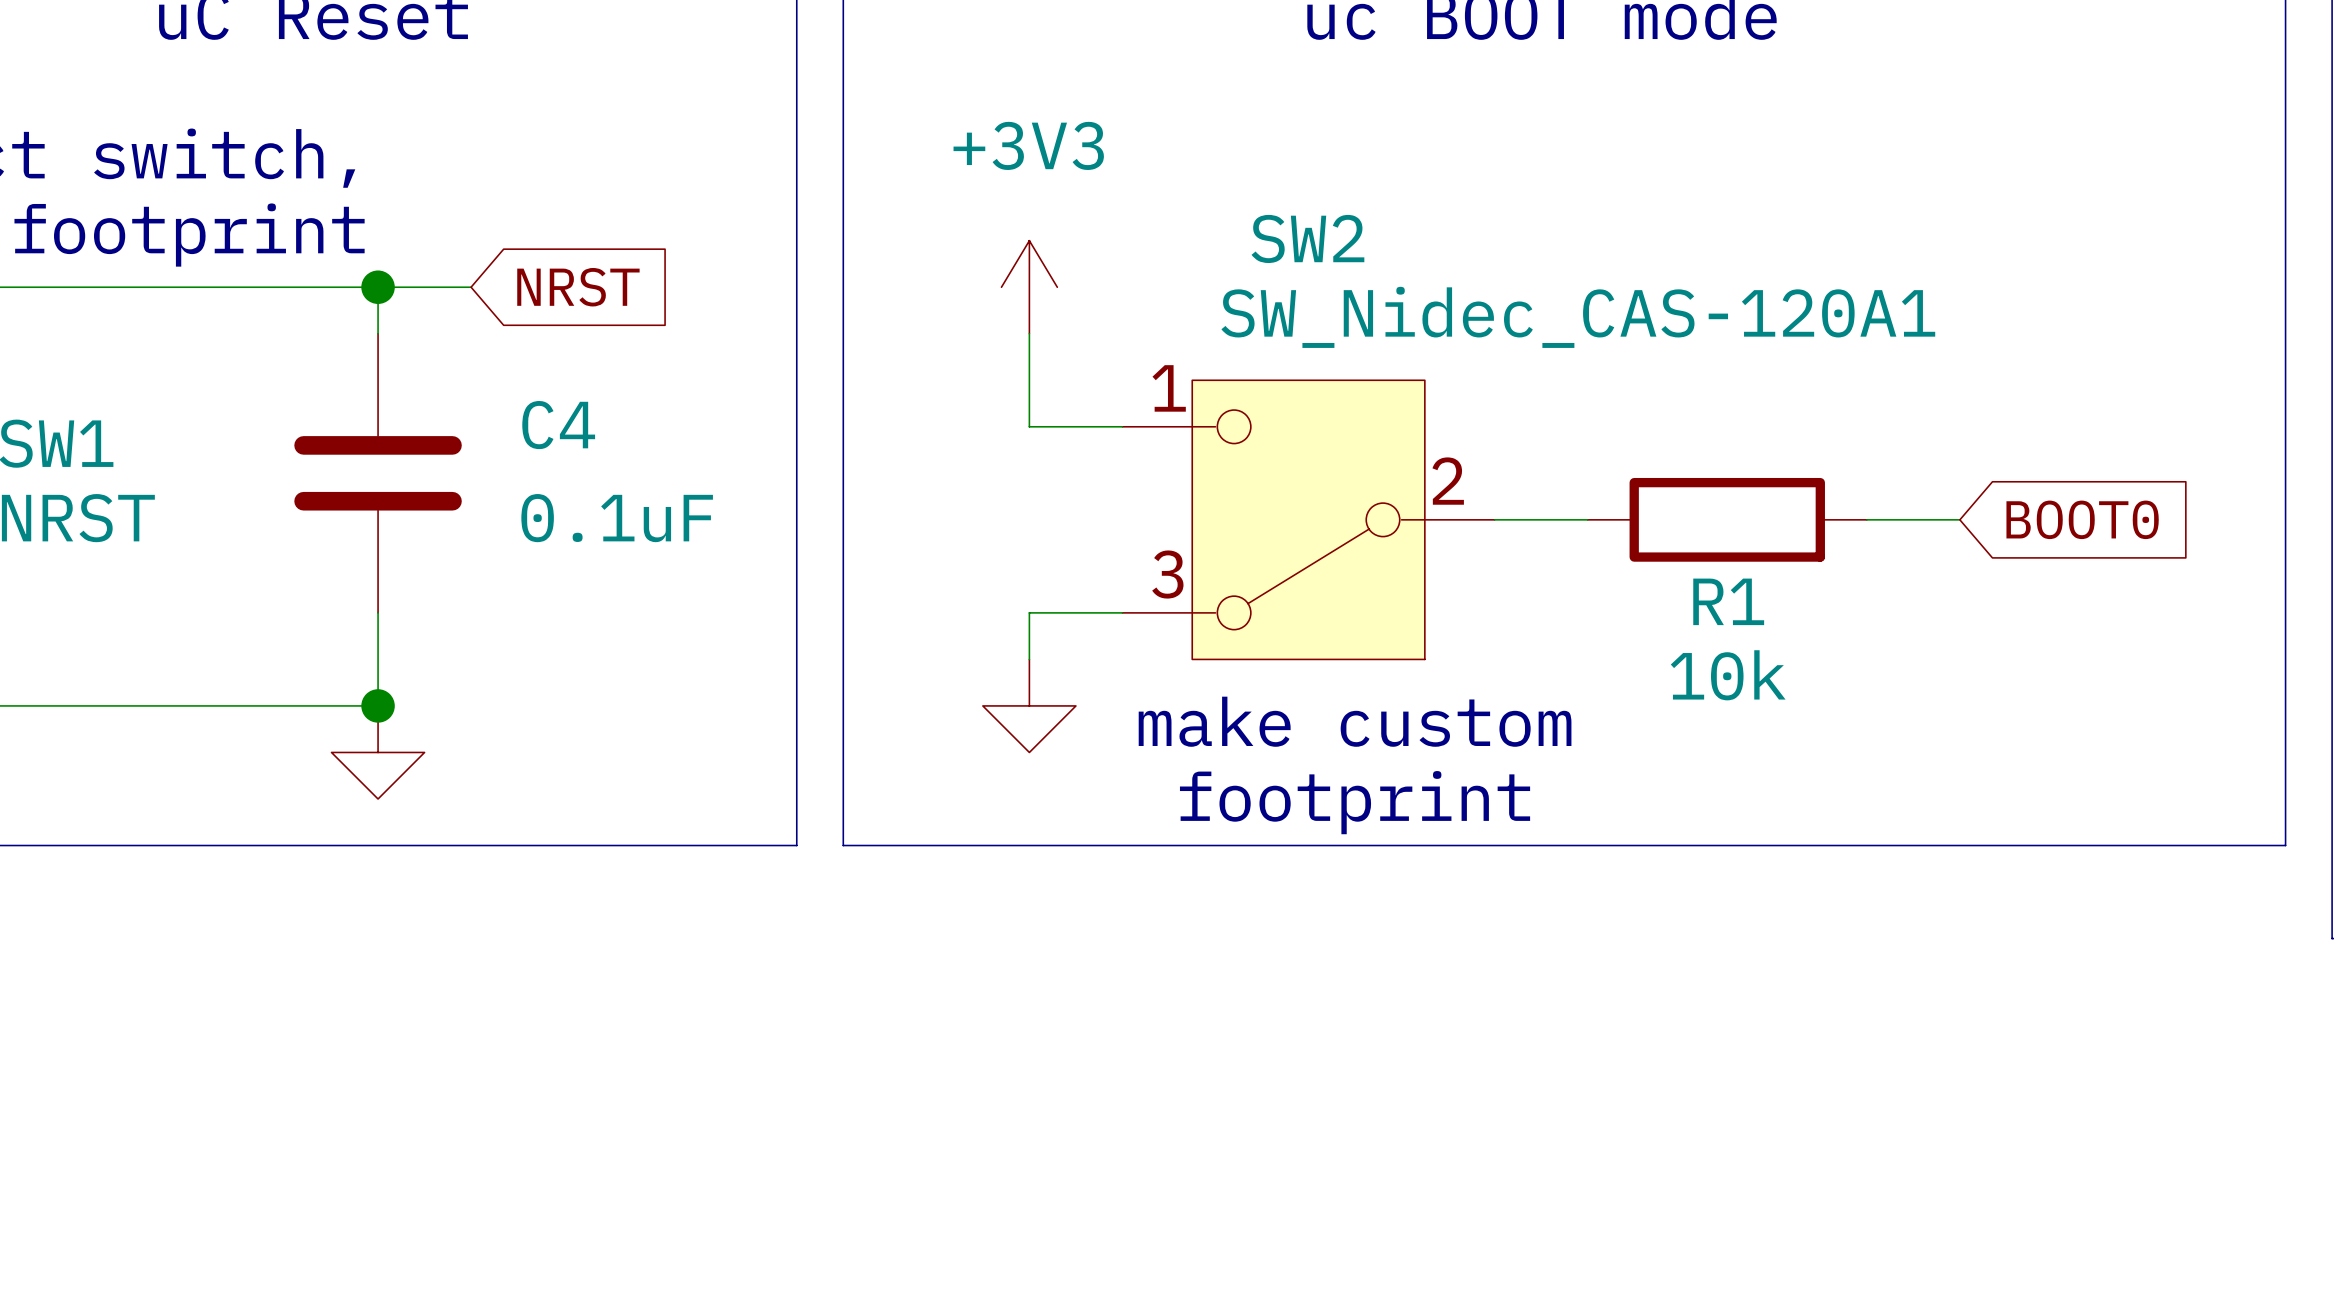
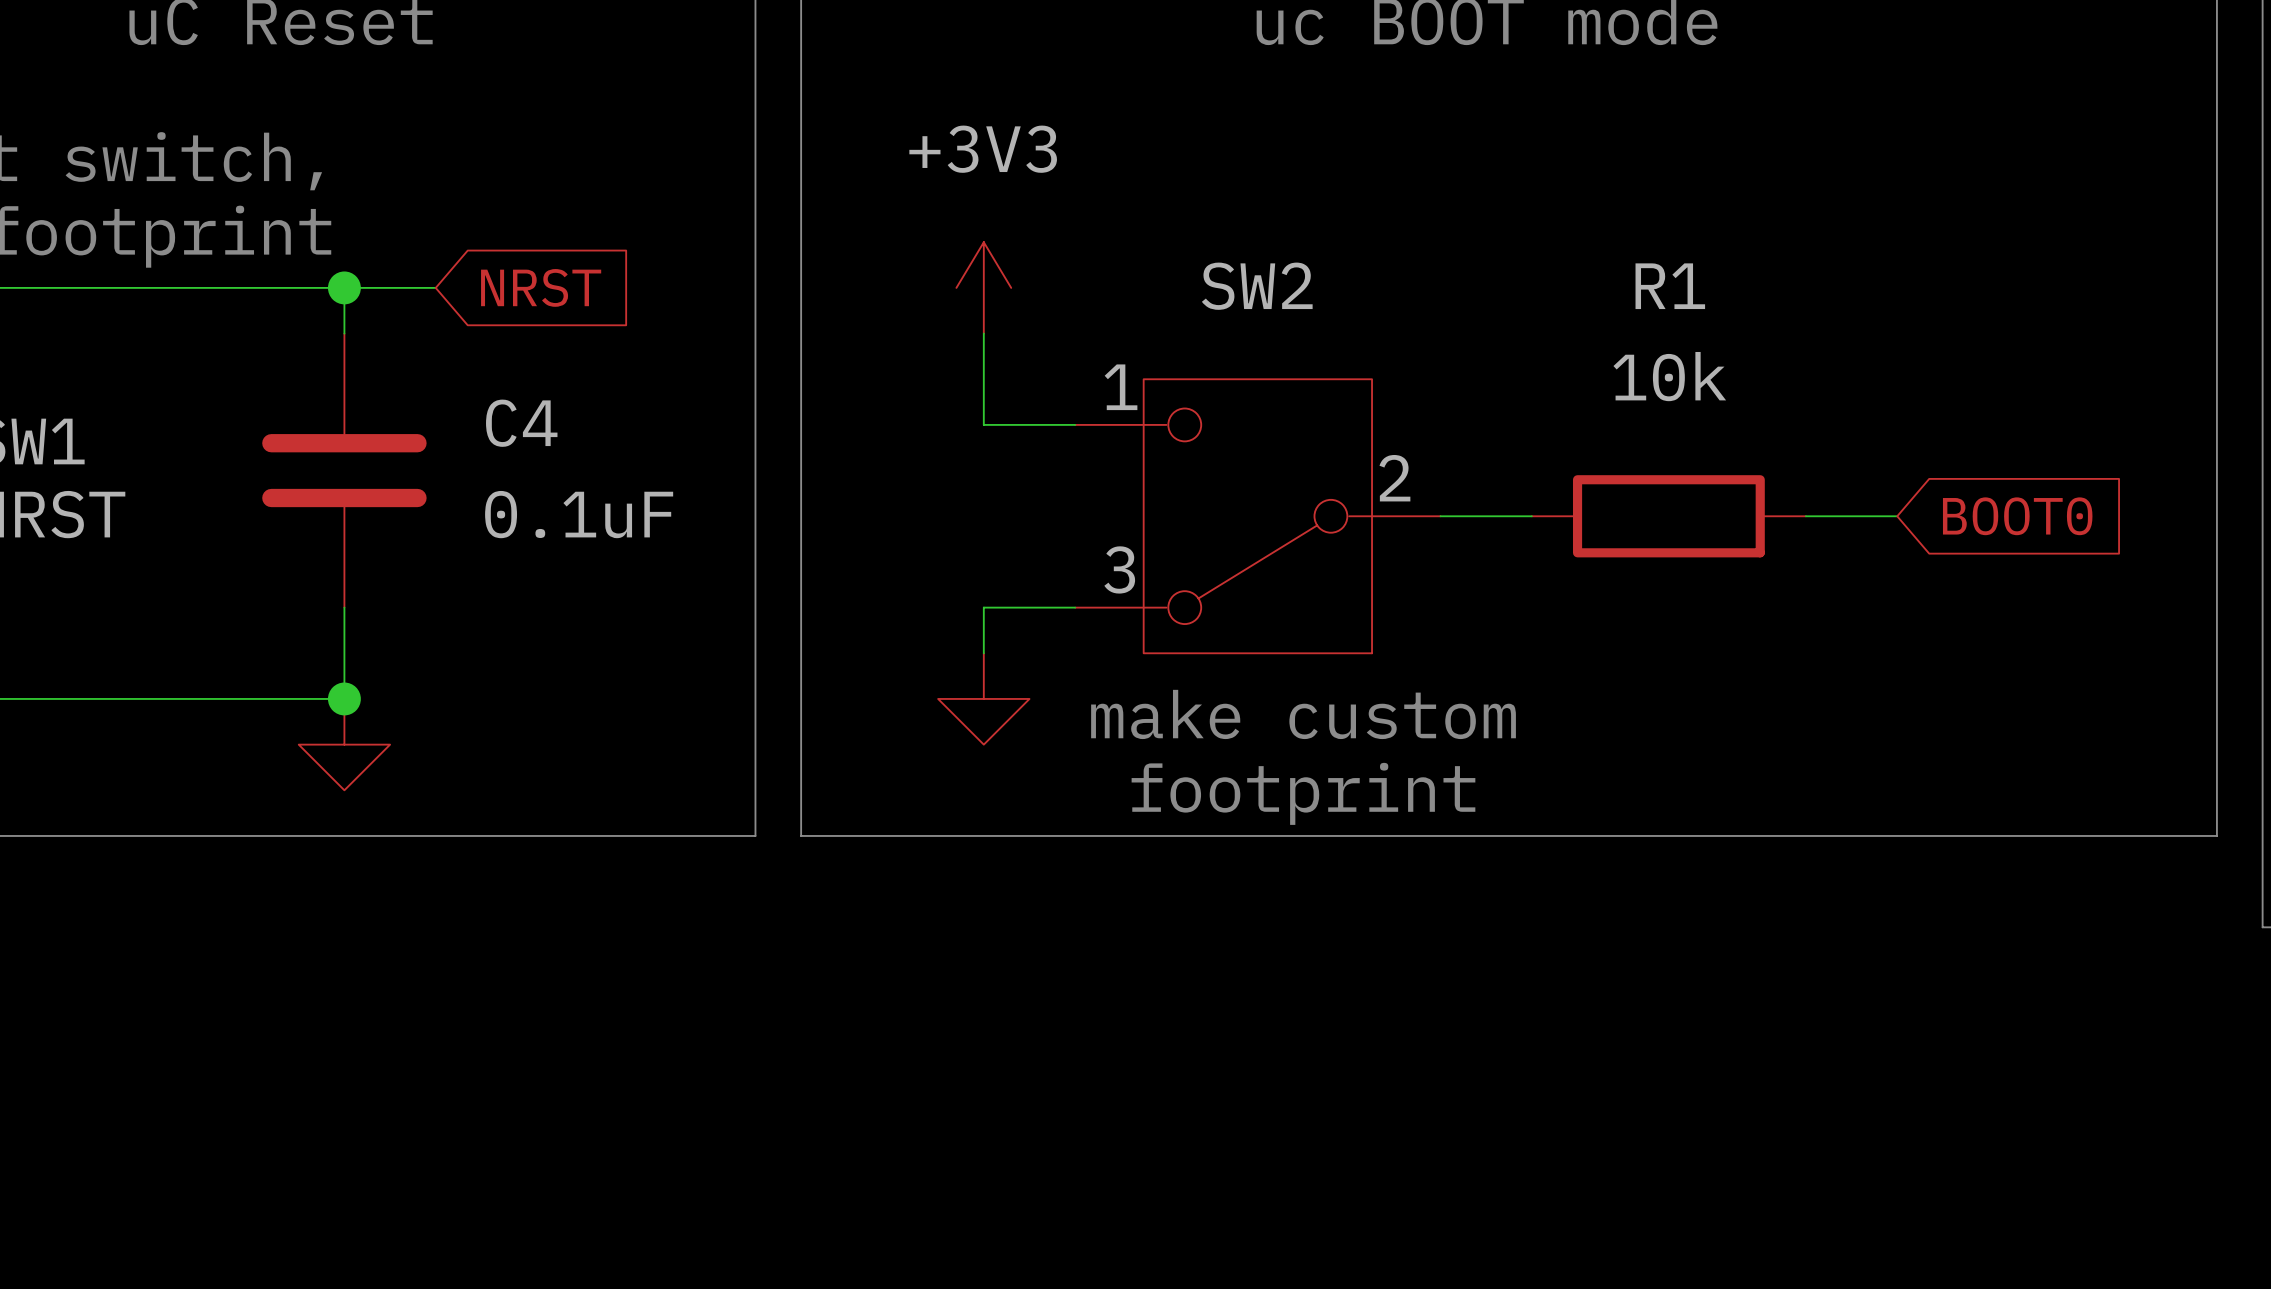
SW2 name position: SW2 (1307, 238) -> SW2 (1257, 286)
SW2 value: SW_Nidec_CAS-120A1 (1578, 317) -> none
R1 name position: R1 (1728, 601) -> R1 (1670, 286)
R1 value position: 10k (1728, 675) -> 10k (1669, 376)

